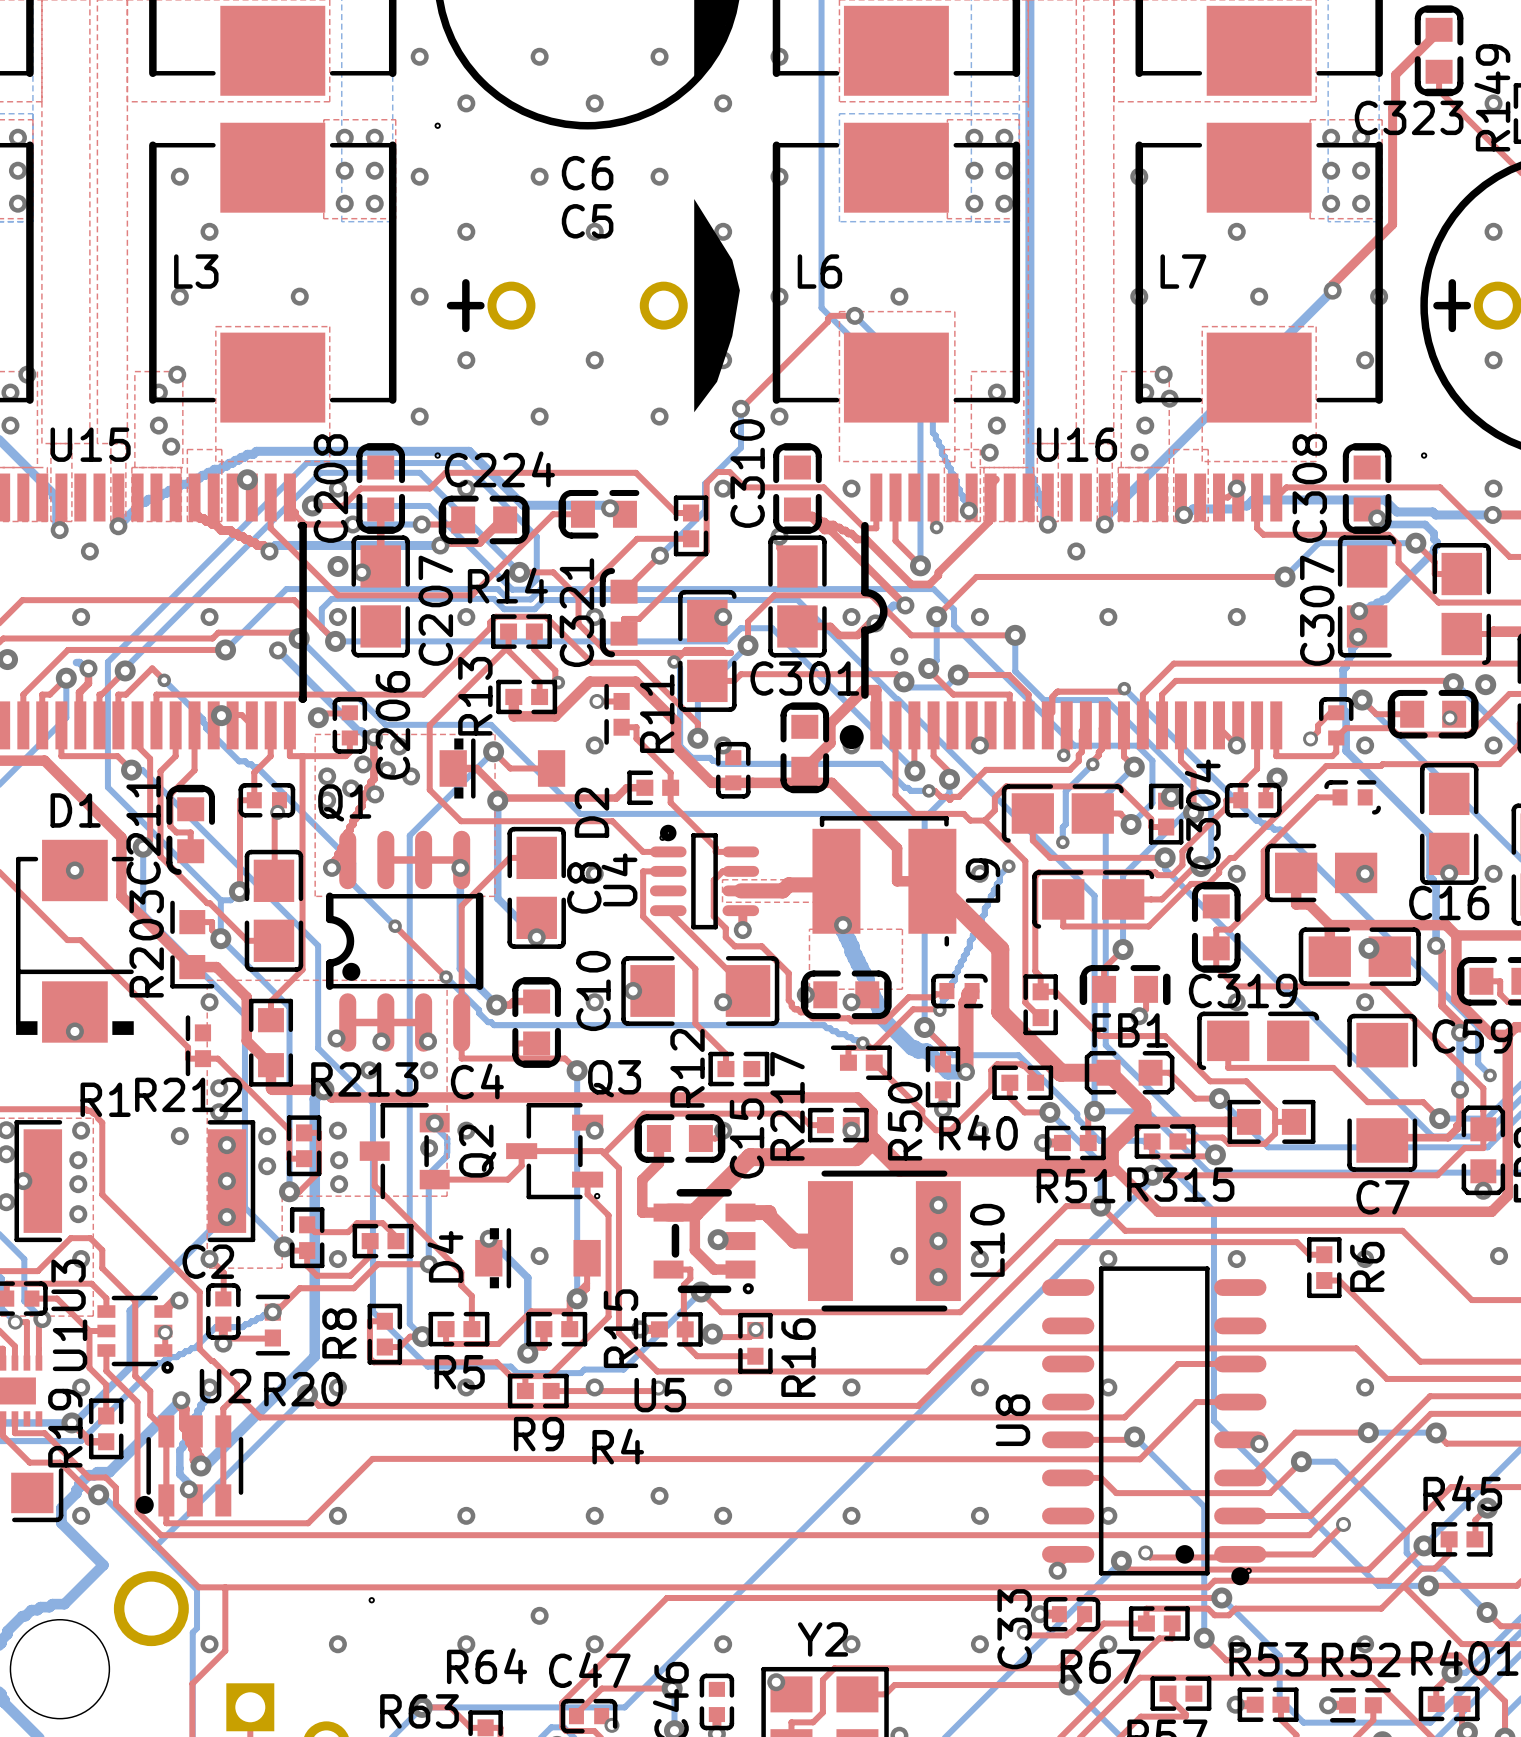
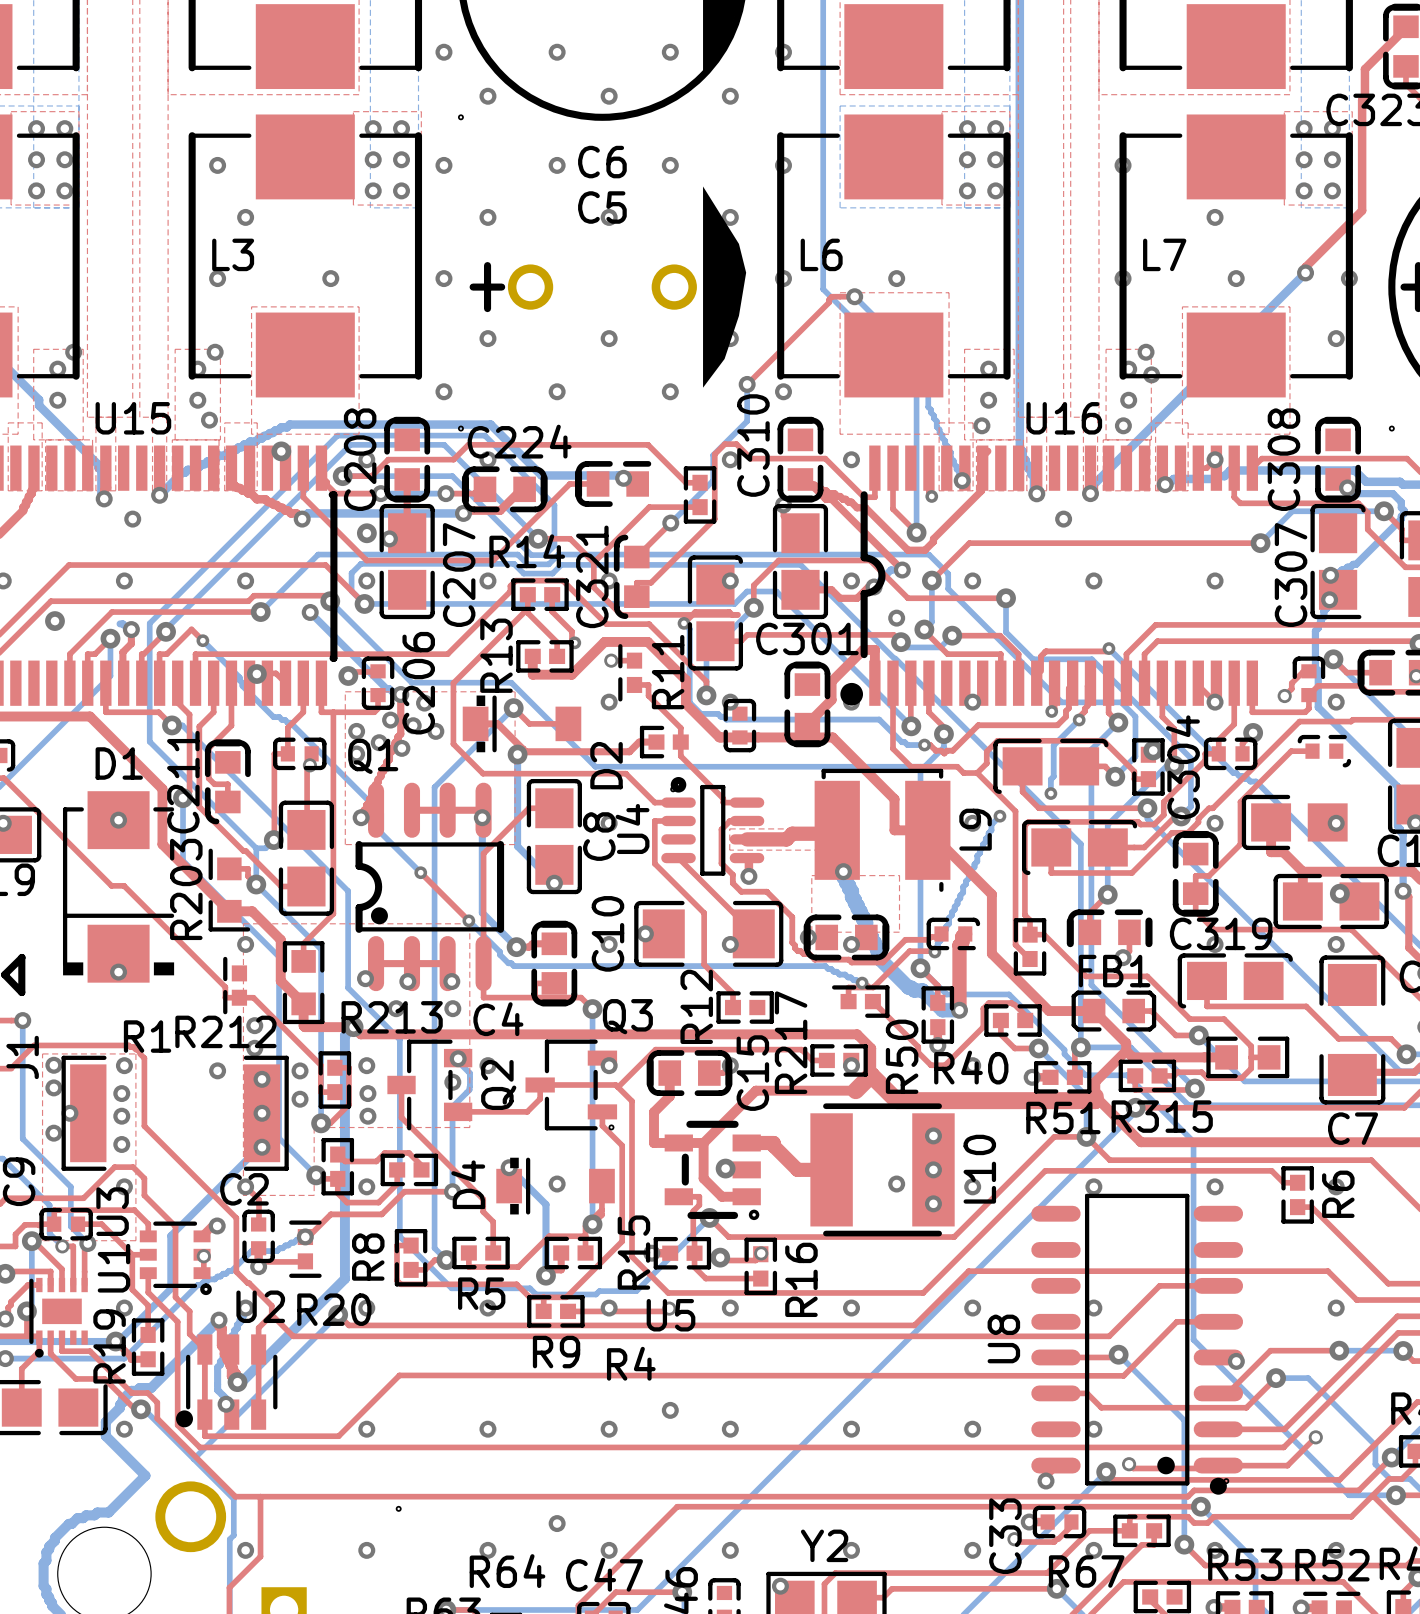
top track width: thick (932, 881) (1000, 949) (1000, 1012) (1060, 1072) (1108, 1072) (1142, 1106) (1142, 1115) (1109, 1147) (1109, 1167) -> thin (927, 830) (991, 894) (991, 953) (1049, 1011) (1094, 1011) (1126, 1043) (1126, 1050) (1095, 1081) (1095, 1100)
top track width: thick (855, 1157) (750, 1157) (694, 1212) (668, 1212) -> thin (855, 1090) (755, 1090) (703, 1142) (678, 1142)

